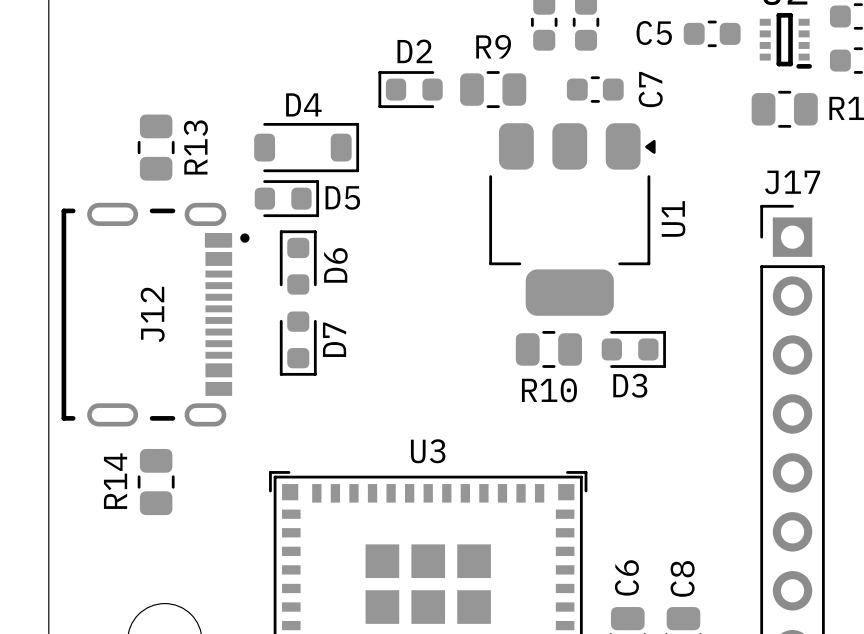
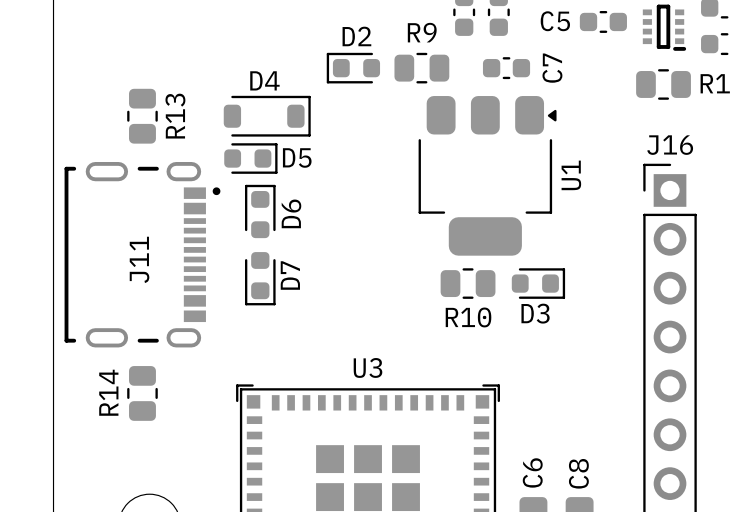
J17 name: J17 (792, 182) -> J16 (670, 145)
J12: (155, 314) -> none
J11: none -> (142, 254)

